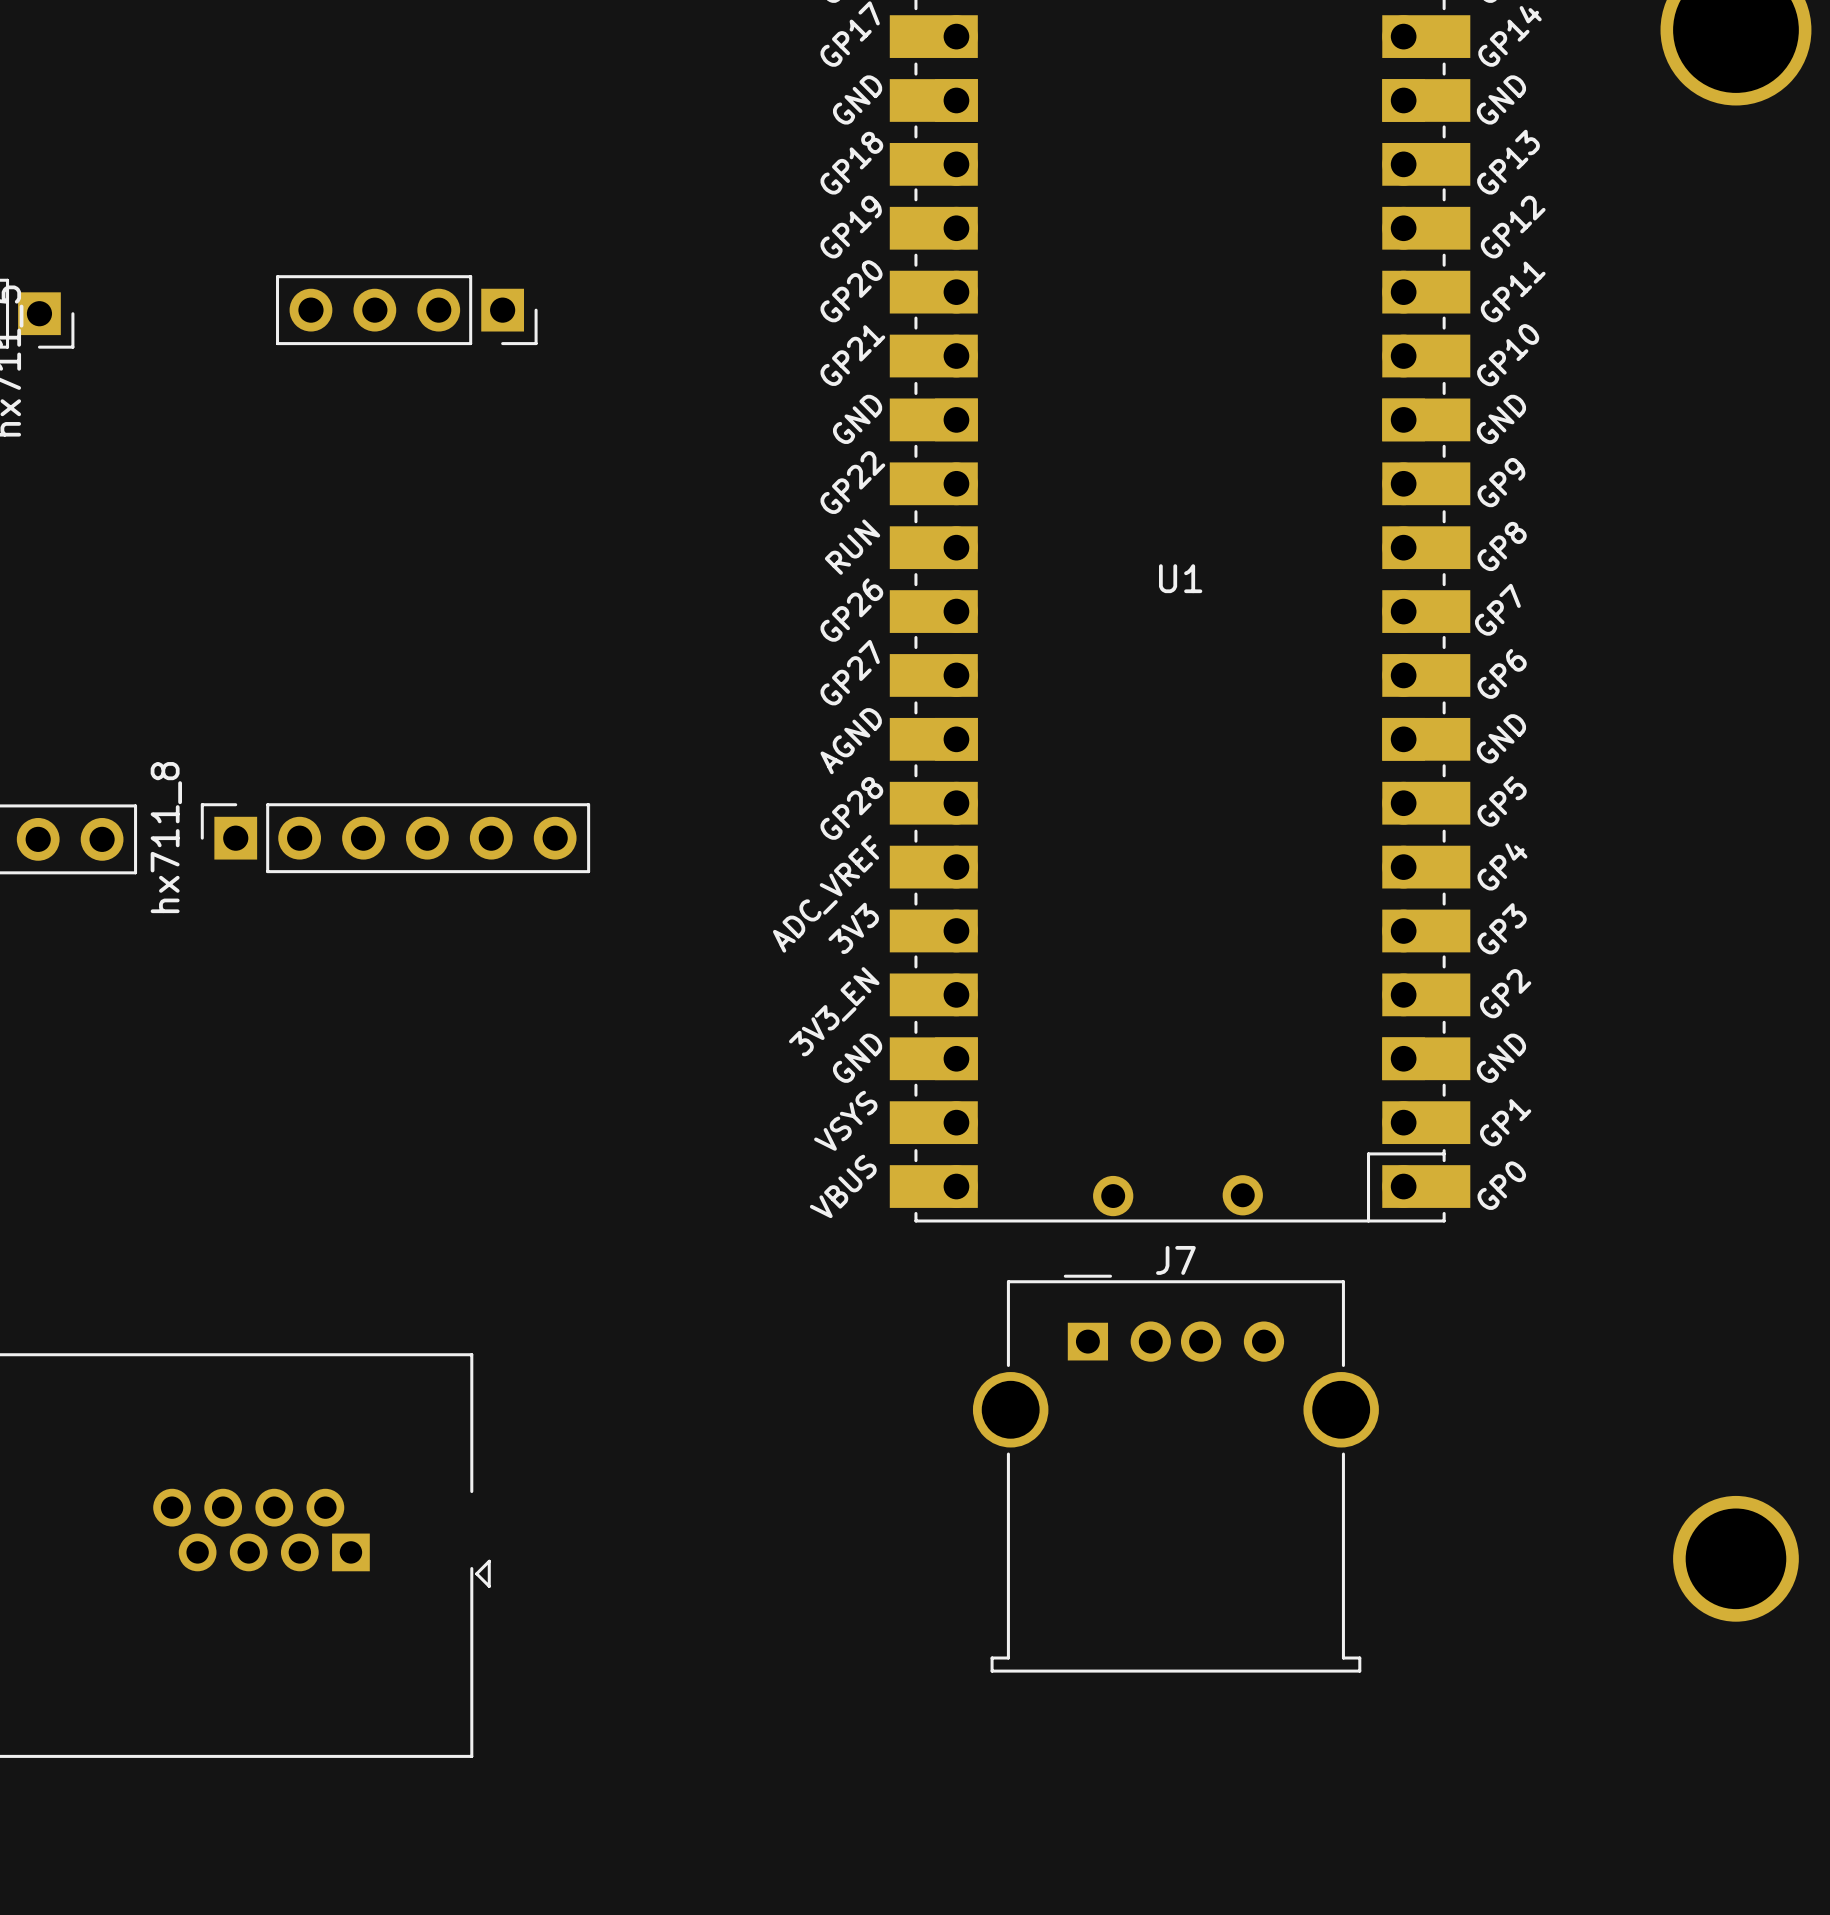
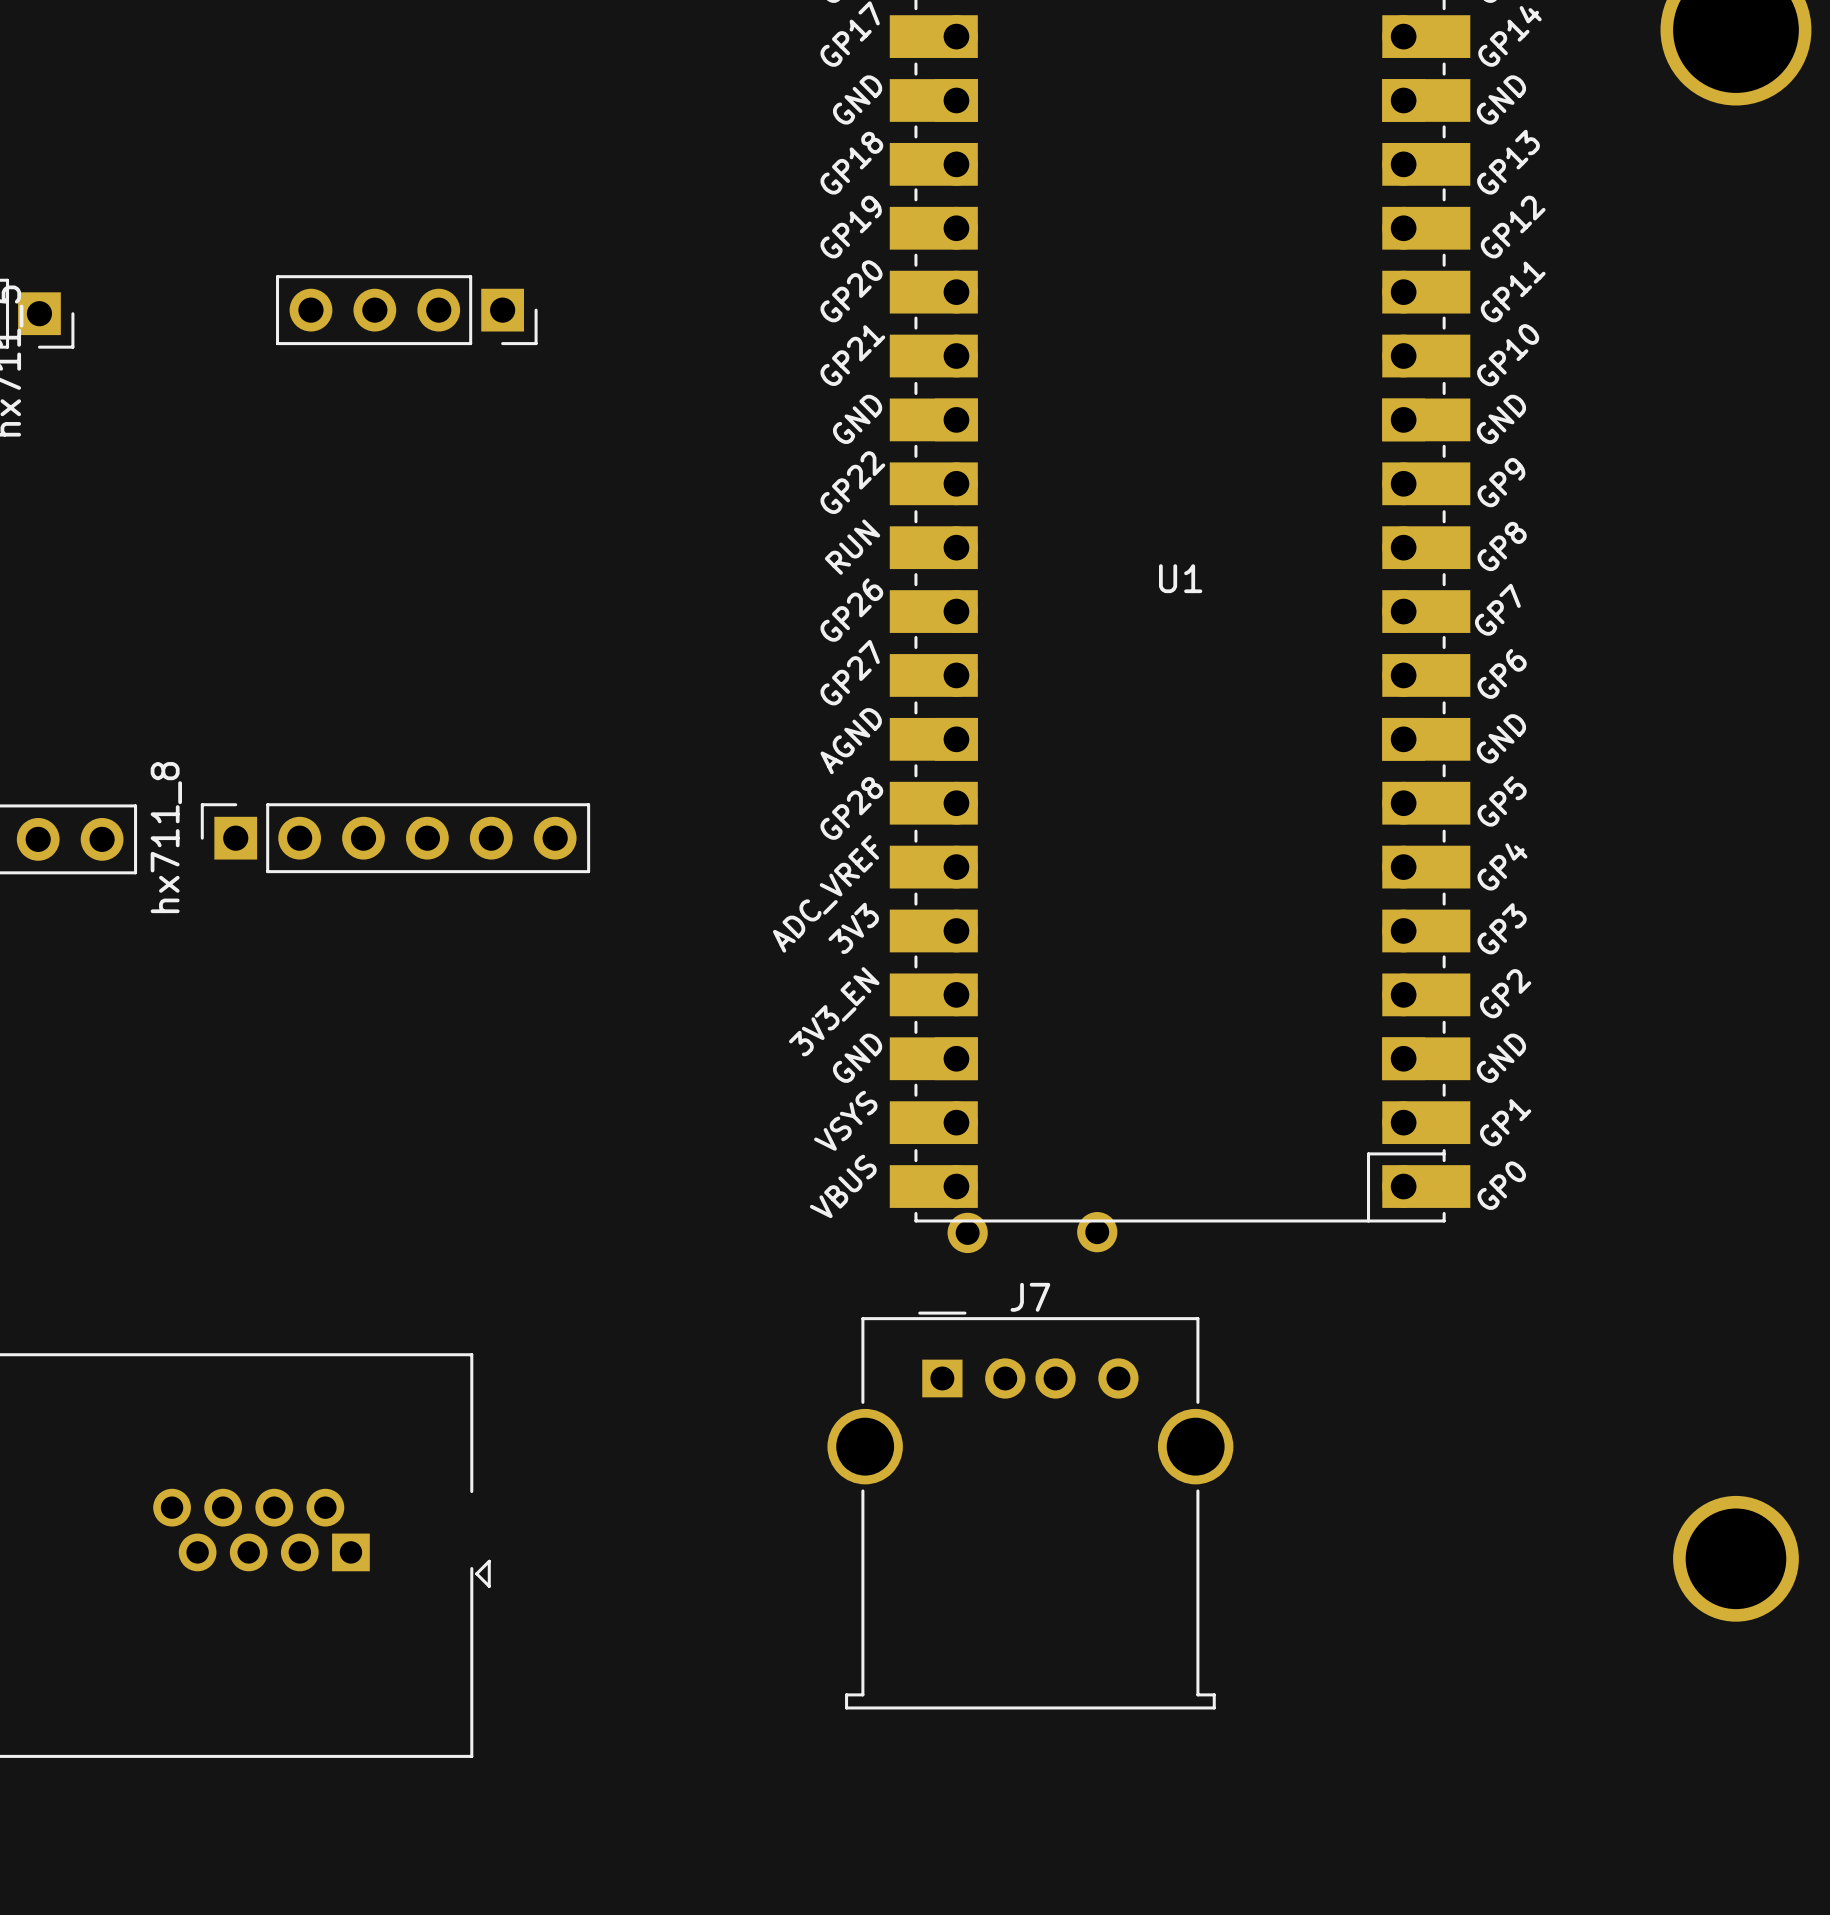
part: (1242, 1195) -> none
part position: (1113, 1196) -> (1097, 1232)
part: none -> (967, 1232)
J7 position: (1175, 1473) -> (1030, 1510)

